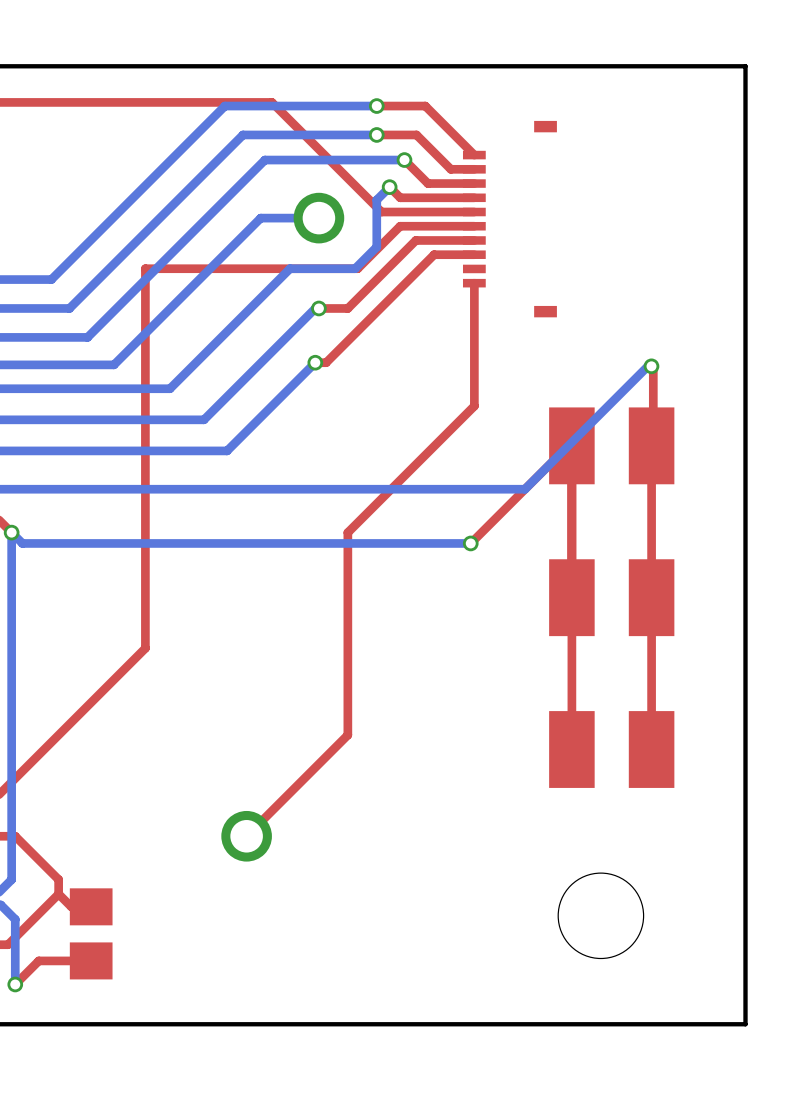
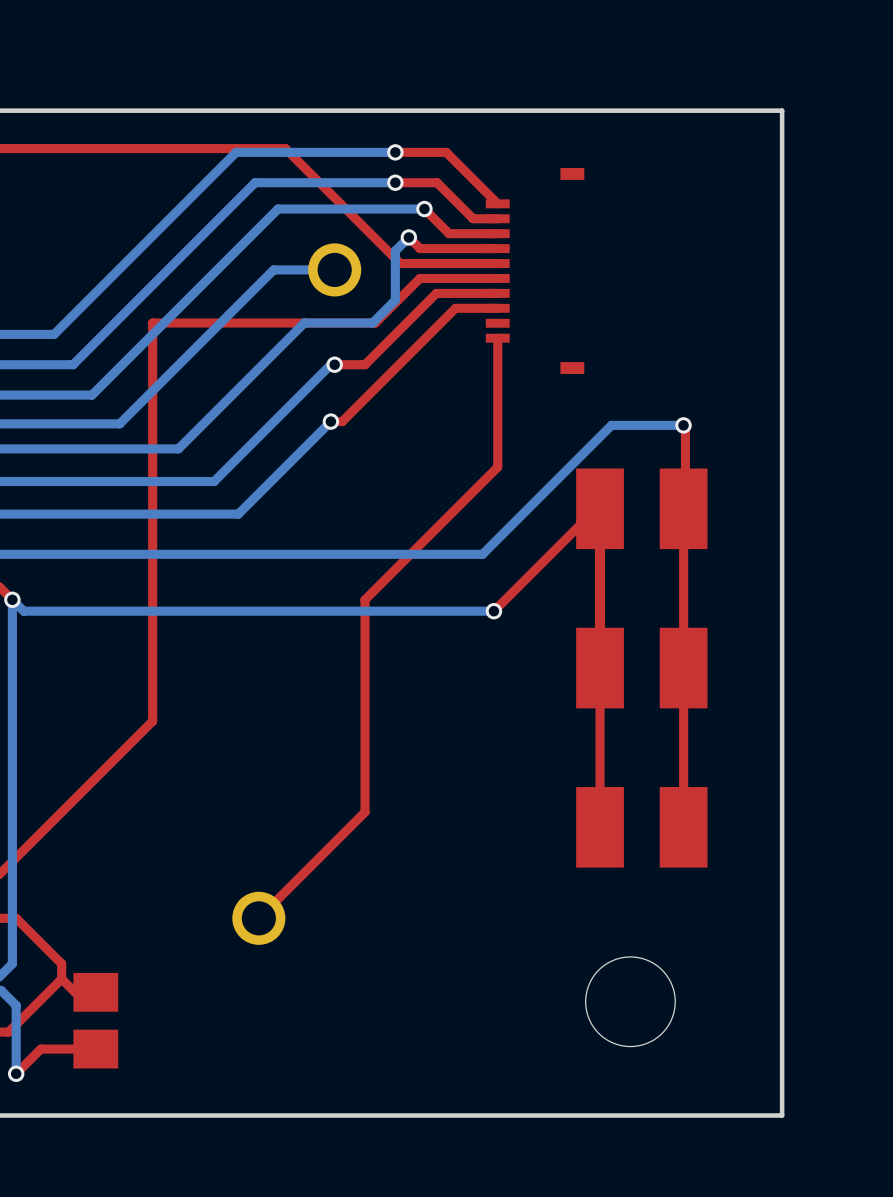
bottom track: (647, 366) (524, 489) (459, 489) -> (679, 425) (611, 425) (482, 554)

